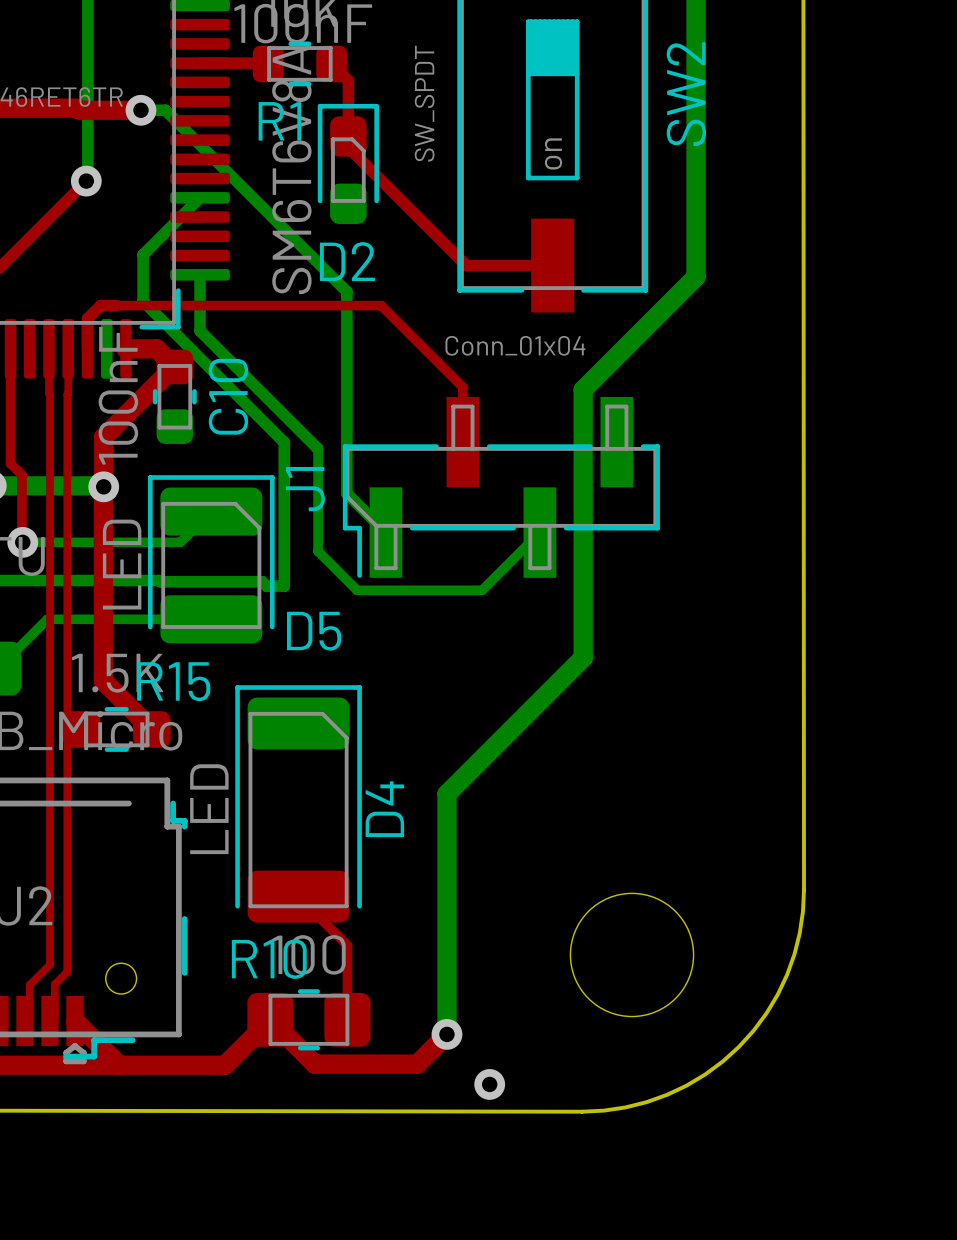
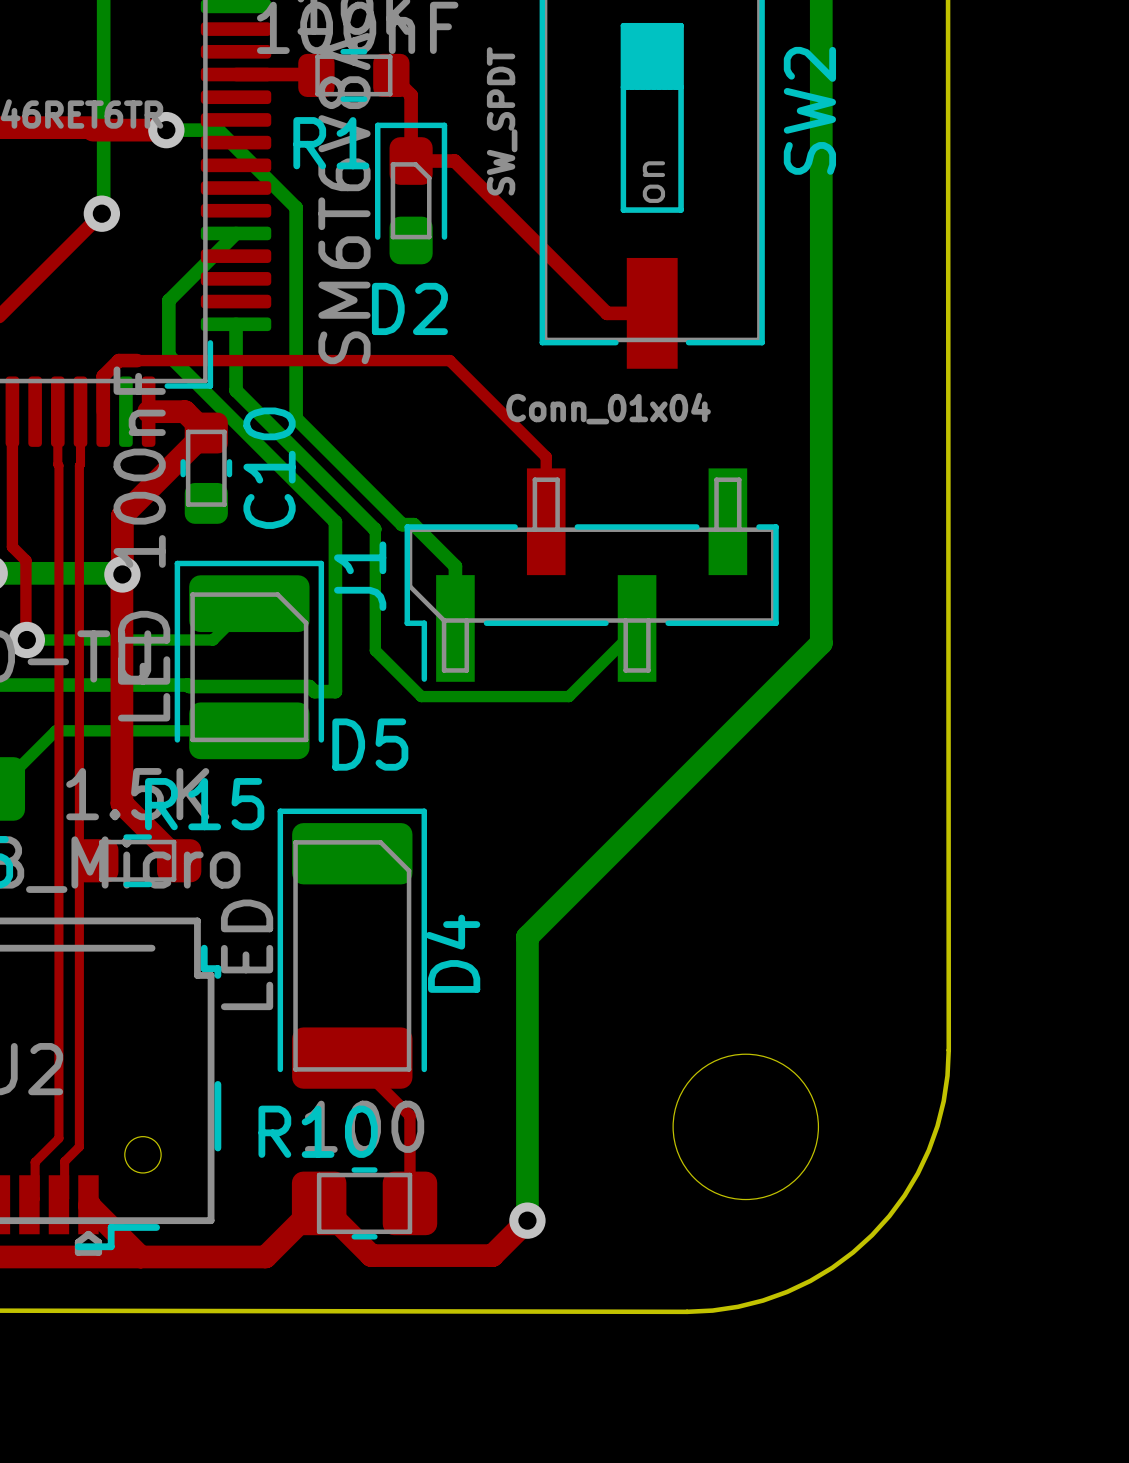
bottom track: (165, 110) (346, 291) (346, 493) (385, 532) -> (195, 130) (218, 130) (296, 207) (296, 418) (402, 524) (413, 524) (455, 566) (455, 628)
top track: (348, 136) (348, 147) (466, 265) (514, 265) -> (411, 161) (454, 161) (607, 313)
bottom track: (695, 276) (583, 389) (583, 657) -> (821, 326) (821, 643) (688, 776)
via: (489, 1084) -> none

